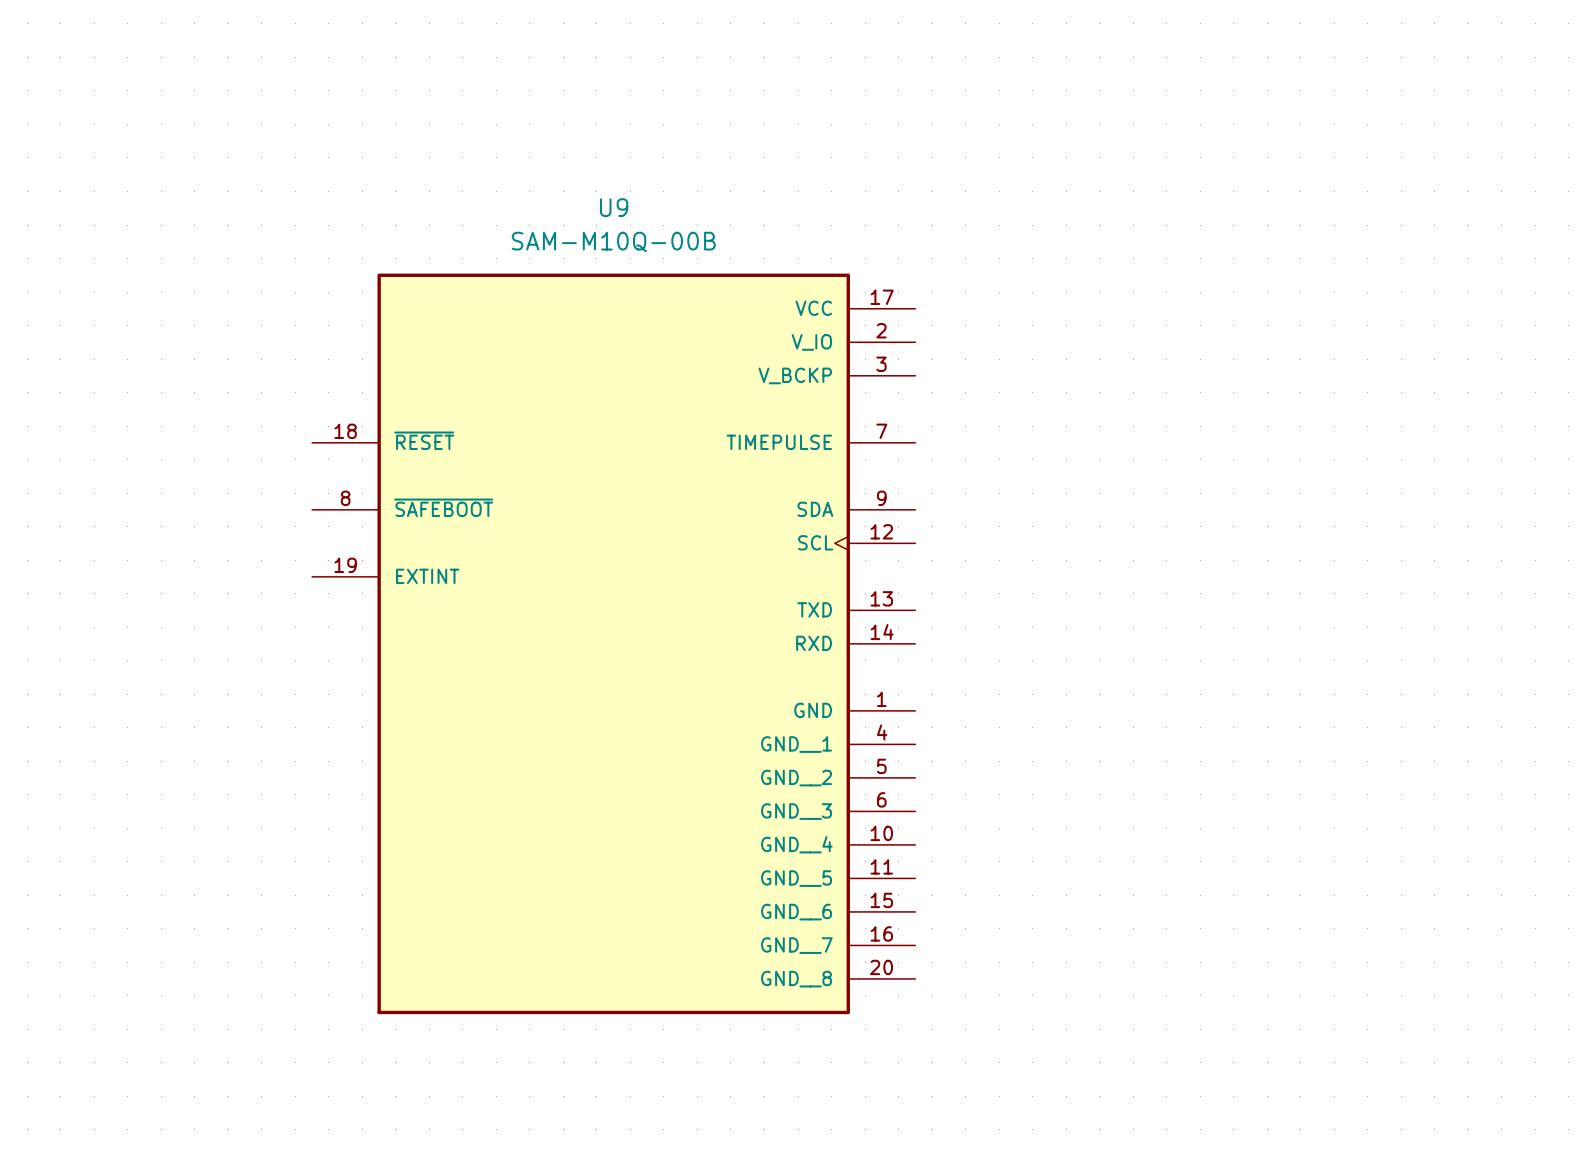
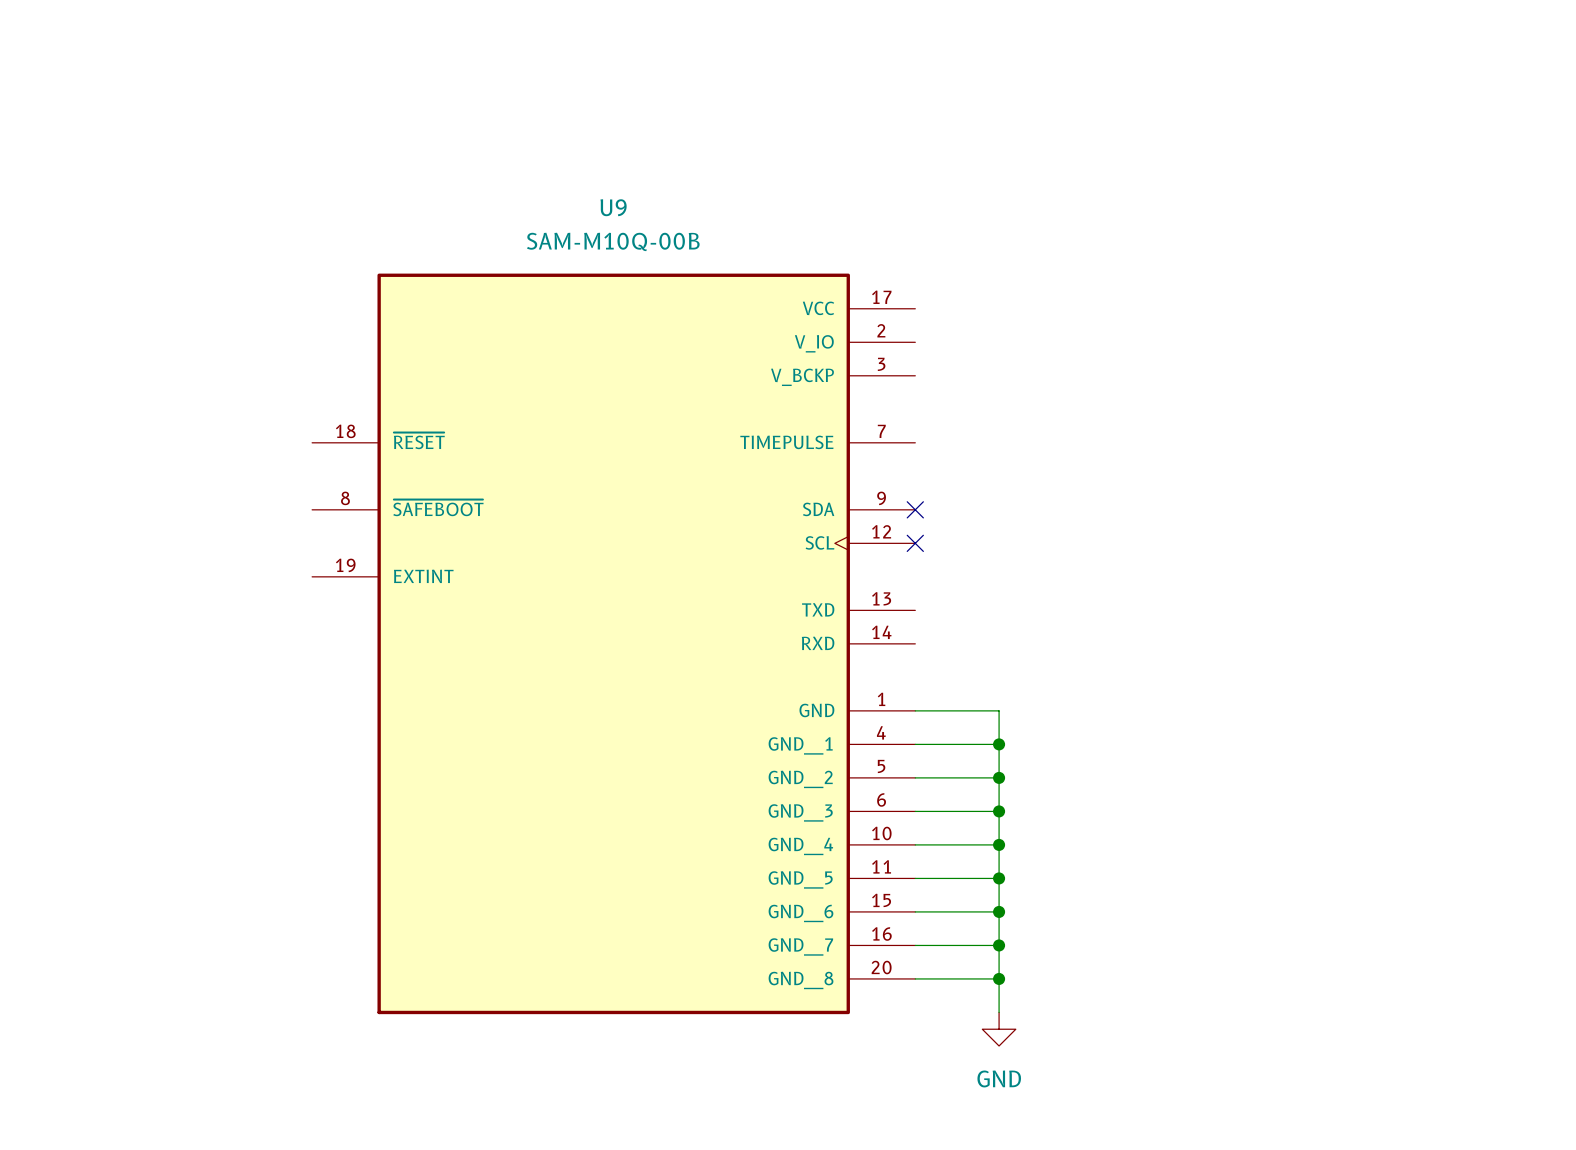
no-connect mark: none -> (915, 509)
no-connect mark: none -> (915, 543)
wire: none -> (915, 710) (999, 710) (999, 1012)
wire: none -> (915, 744) (999, 744)
junction: none -> (999, 744)
wire: none -> (915, 777) (999, 777)
junction: none -> (999, 777)
wire: none -> (915, 811) (999, 811)
junction: none -> (999, 811)
wire: none -> (915, 844) (999, 844)
junction: none -> (999, 844)
wire: none -> (915, 878) (999, 878)
junction: none -> (999, 878)
wire: none -> (915, 911) (999, 911)
junction: none -> (999, 911)
wire: none -> (915, 945) (999, 945)
junction: none -> (999, 945)
wire: none -> (915, 978) (999, 978)
junction: none -> (999, 978)
power symbol: none -> GND (999, 1029)

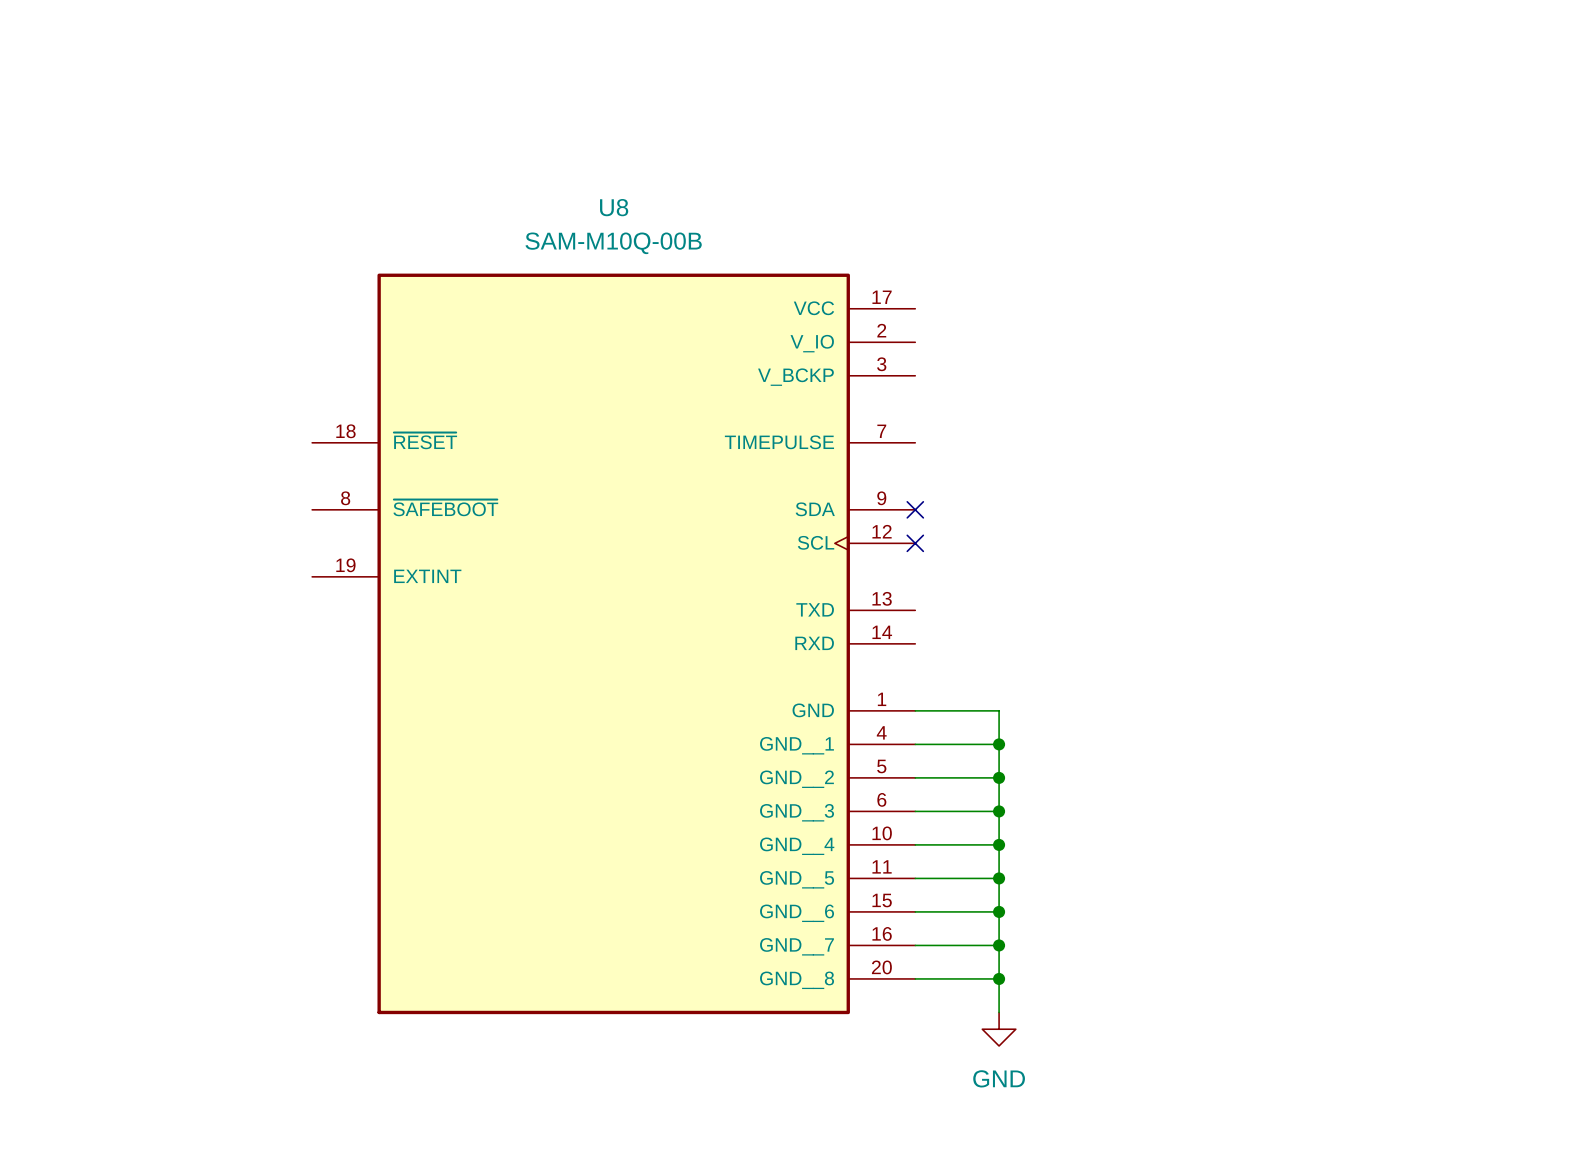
U9 name: U9 (613, 207) -> U8 (614, 207)

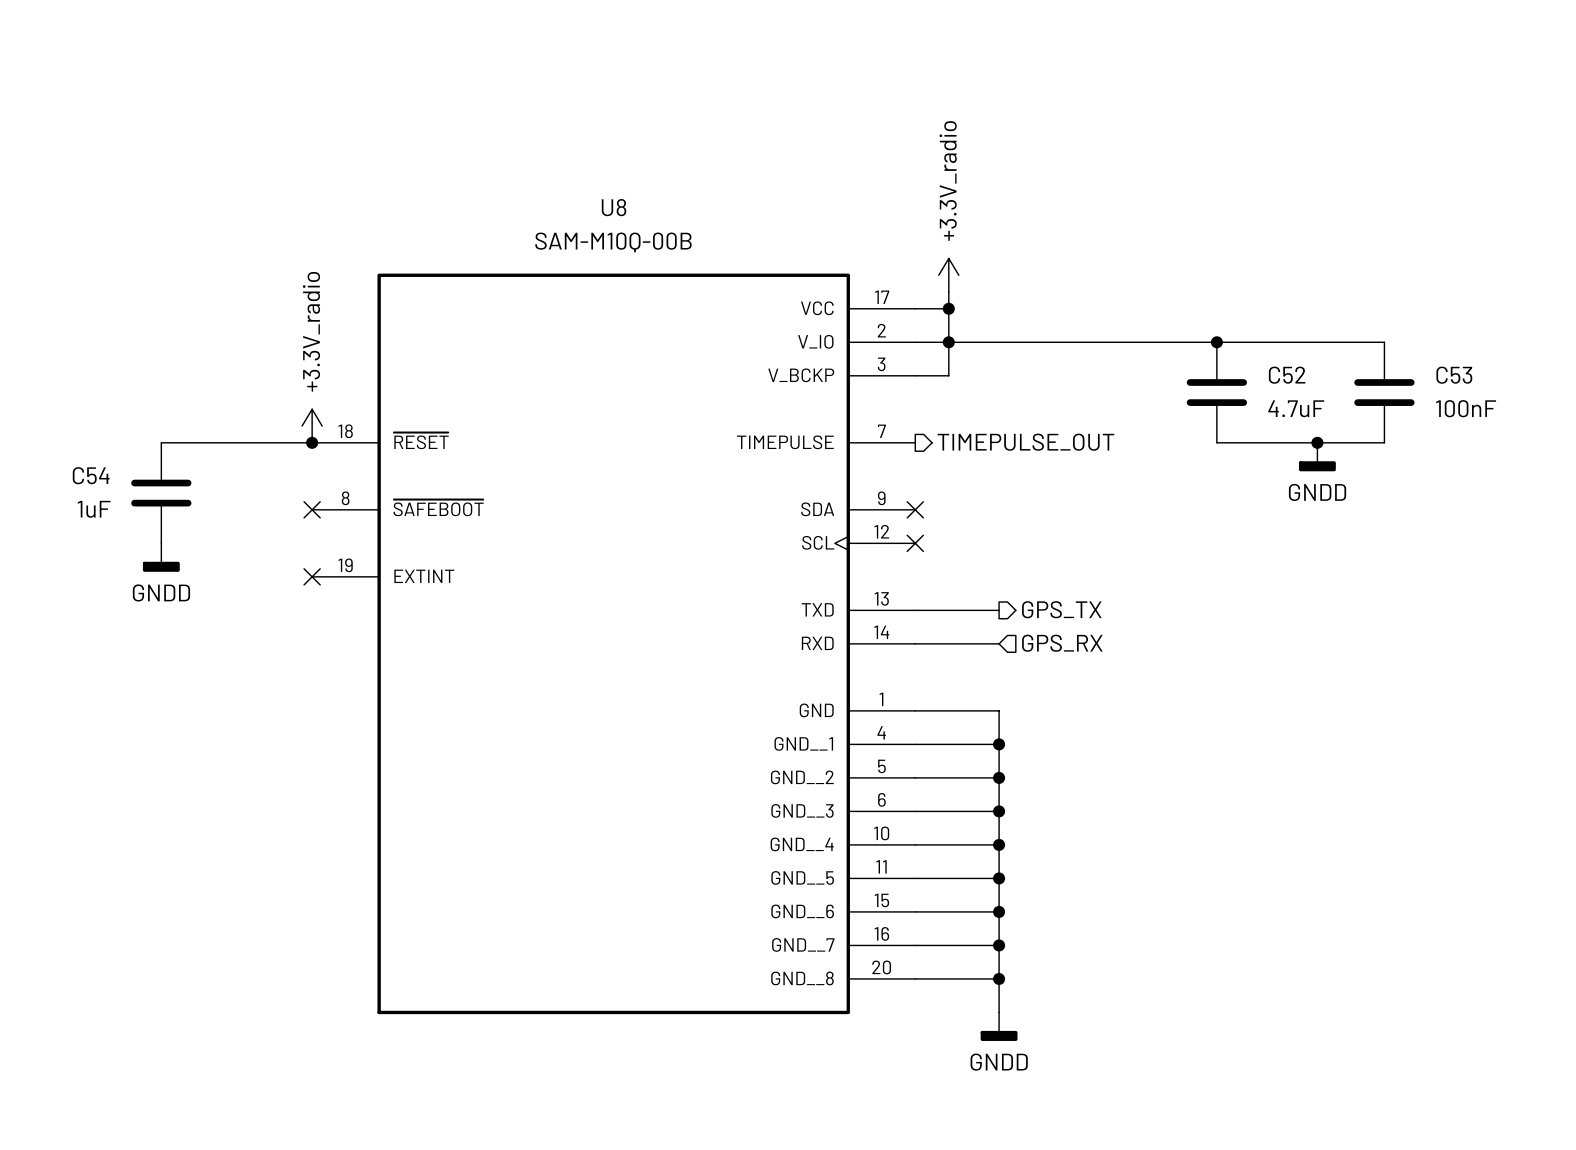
power symbol: none -> +3.3V_radio (948, 275)
wire: none -> (948, 292) (948, 375) (915, 375)
wire: none -> (915, 308) (948, 308)
junction: none -> (948, 308)
wire: none -> (915, 342) (1384, 342)
junction: none -> (948, 342)
junction: none -> (1216, 342)
C52: none -> 4.7uF (1216, 392)
C53: none -> 100nF (1384, 392)
power symbol: none -> +3.3V_radio (312, 426)
wire: none -> (161, 442) (312, 442)
junction: none -> (312, 442)
wire: none -> (1216, 442) (1384, 442)
junction: none -> (1317, 442)
hierarchical label: none -> TIMEPULSE_OUT (1025, 442)
power symbol: none -> GNDD (1317, 457)
C54: none -> 1uF (161, 493)
no-connect mark: none -> (312, 509)
power symbol: none -> GNDD (161, 557)
no-connect mark: none -> (312, 576)
wire: none -> (915, 610) (999, 610)
hierarchical label: none -> GPS_TX (1061, 609)
wire: none -> (915, 643) (999, 643)
hierarchical label: none -> GPS_RX (1062, 643)
power symbol: GND (999, 1029) -> GNDD (999, 1026)

